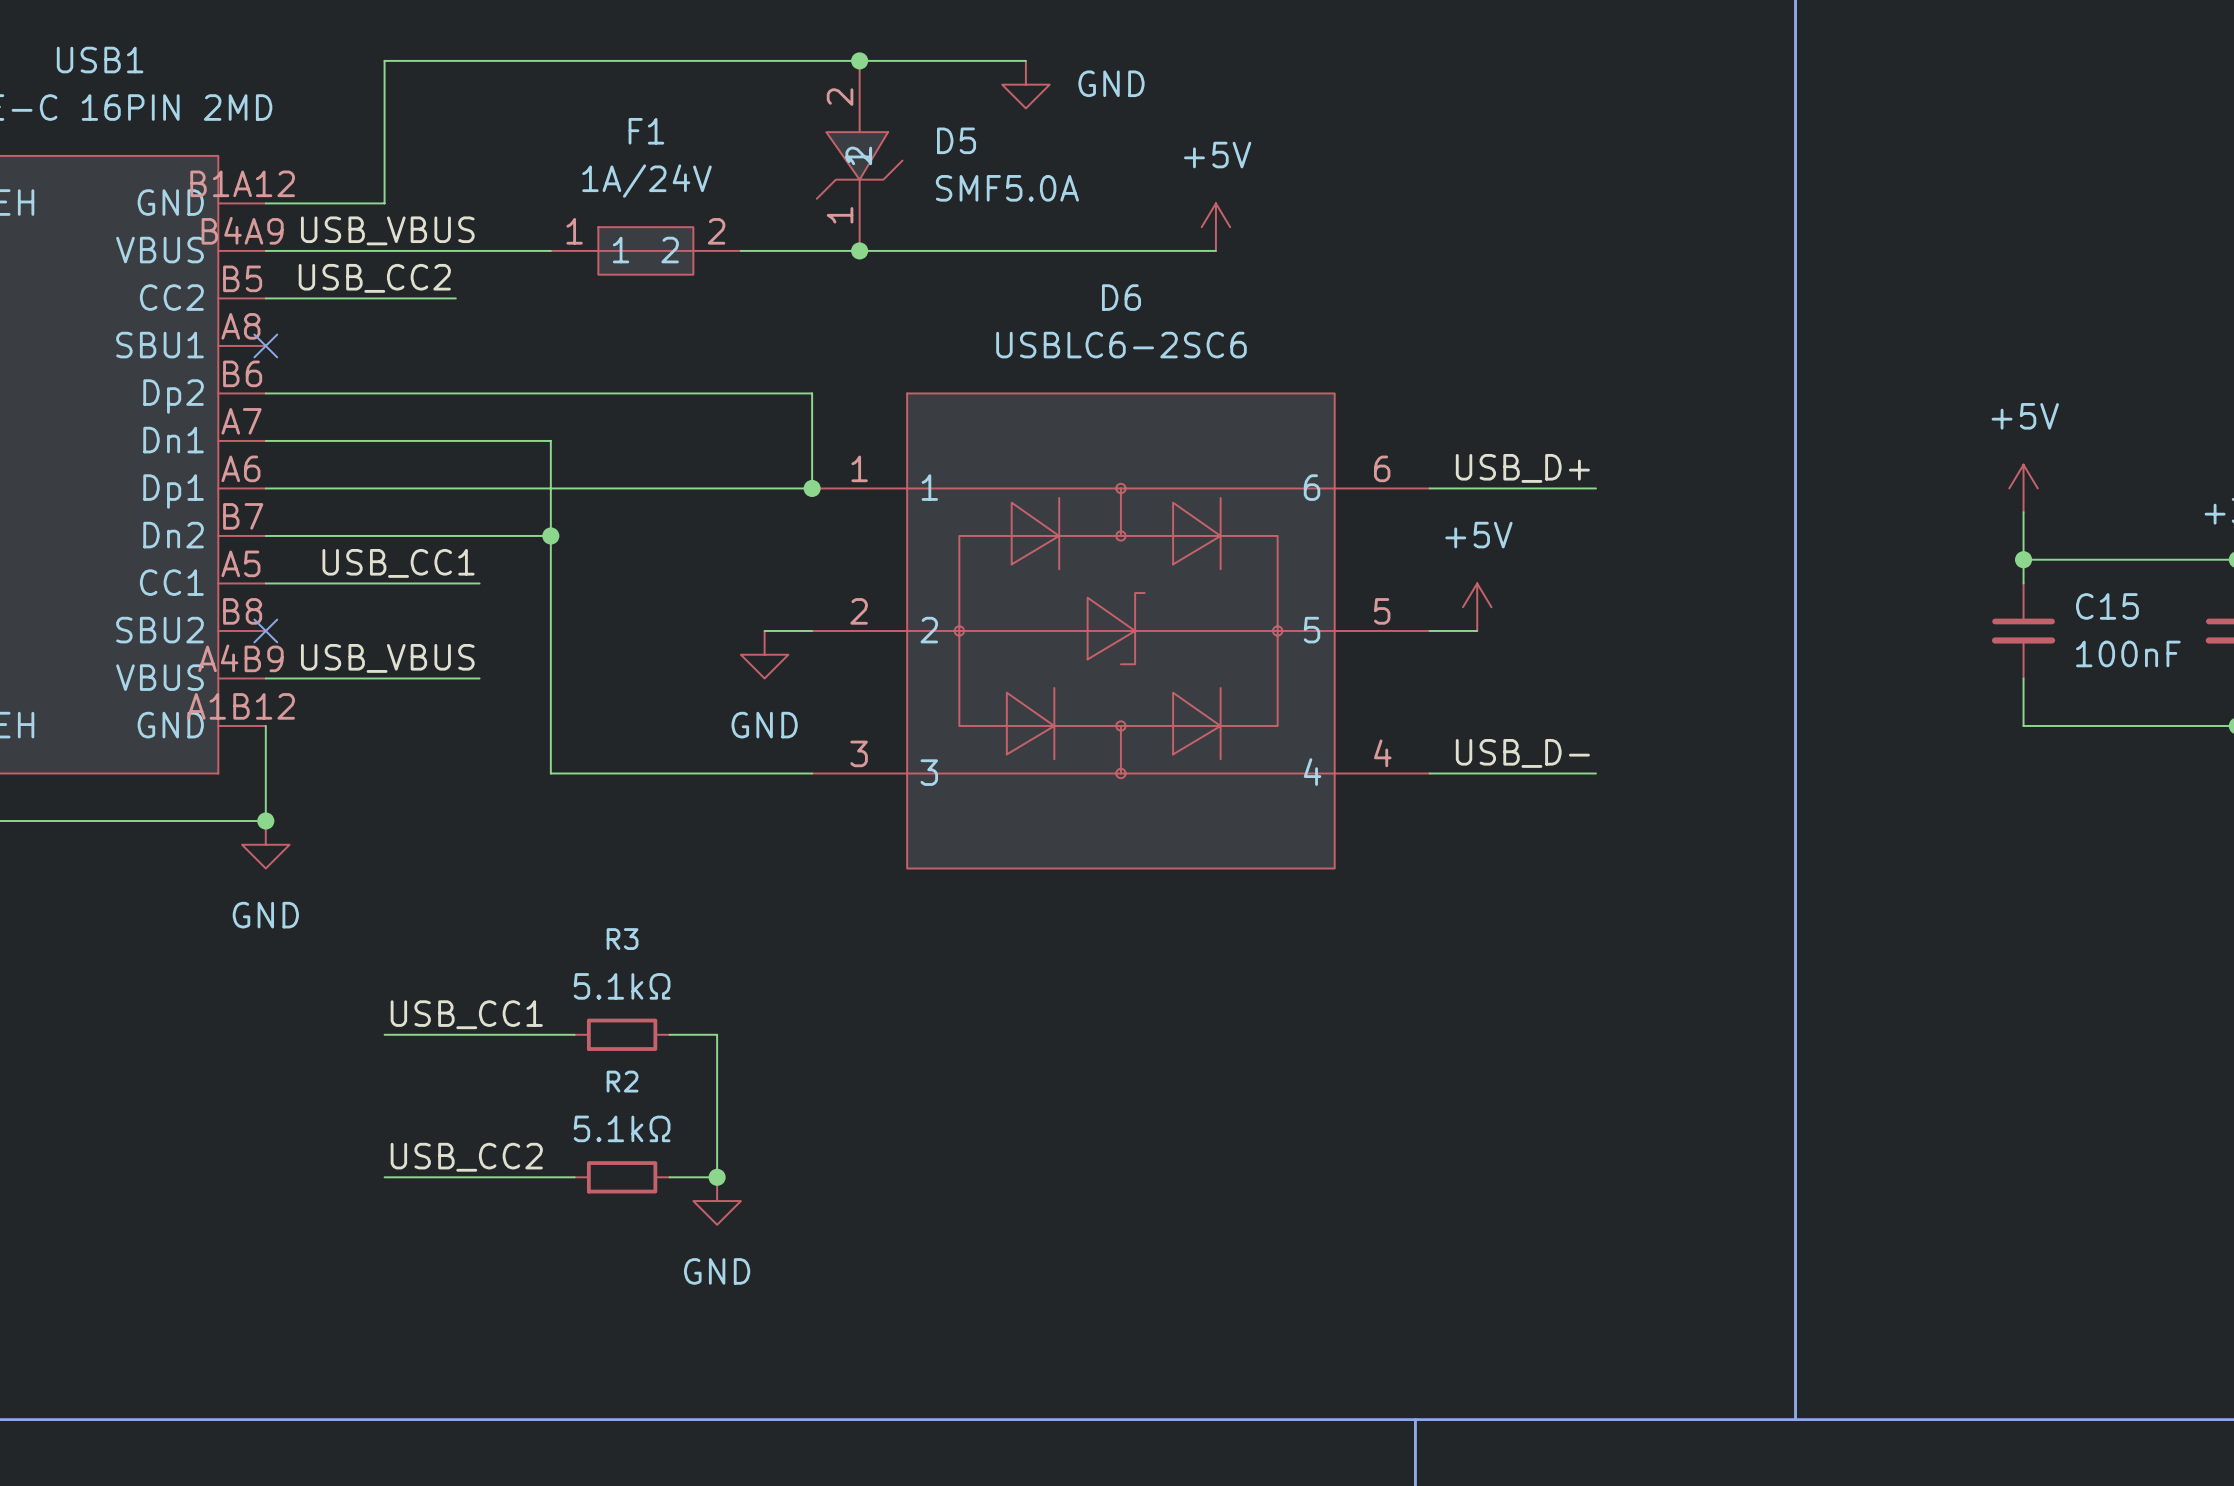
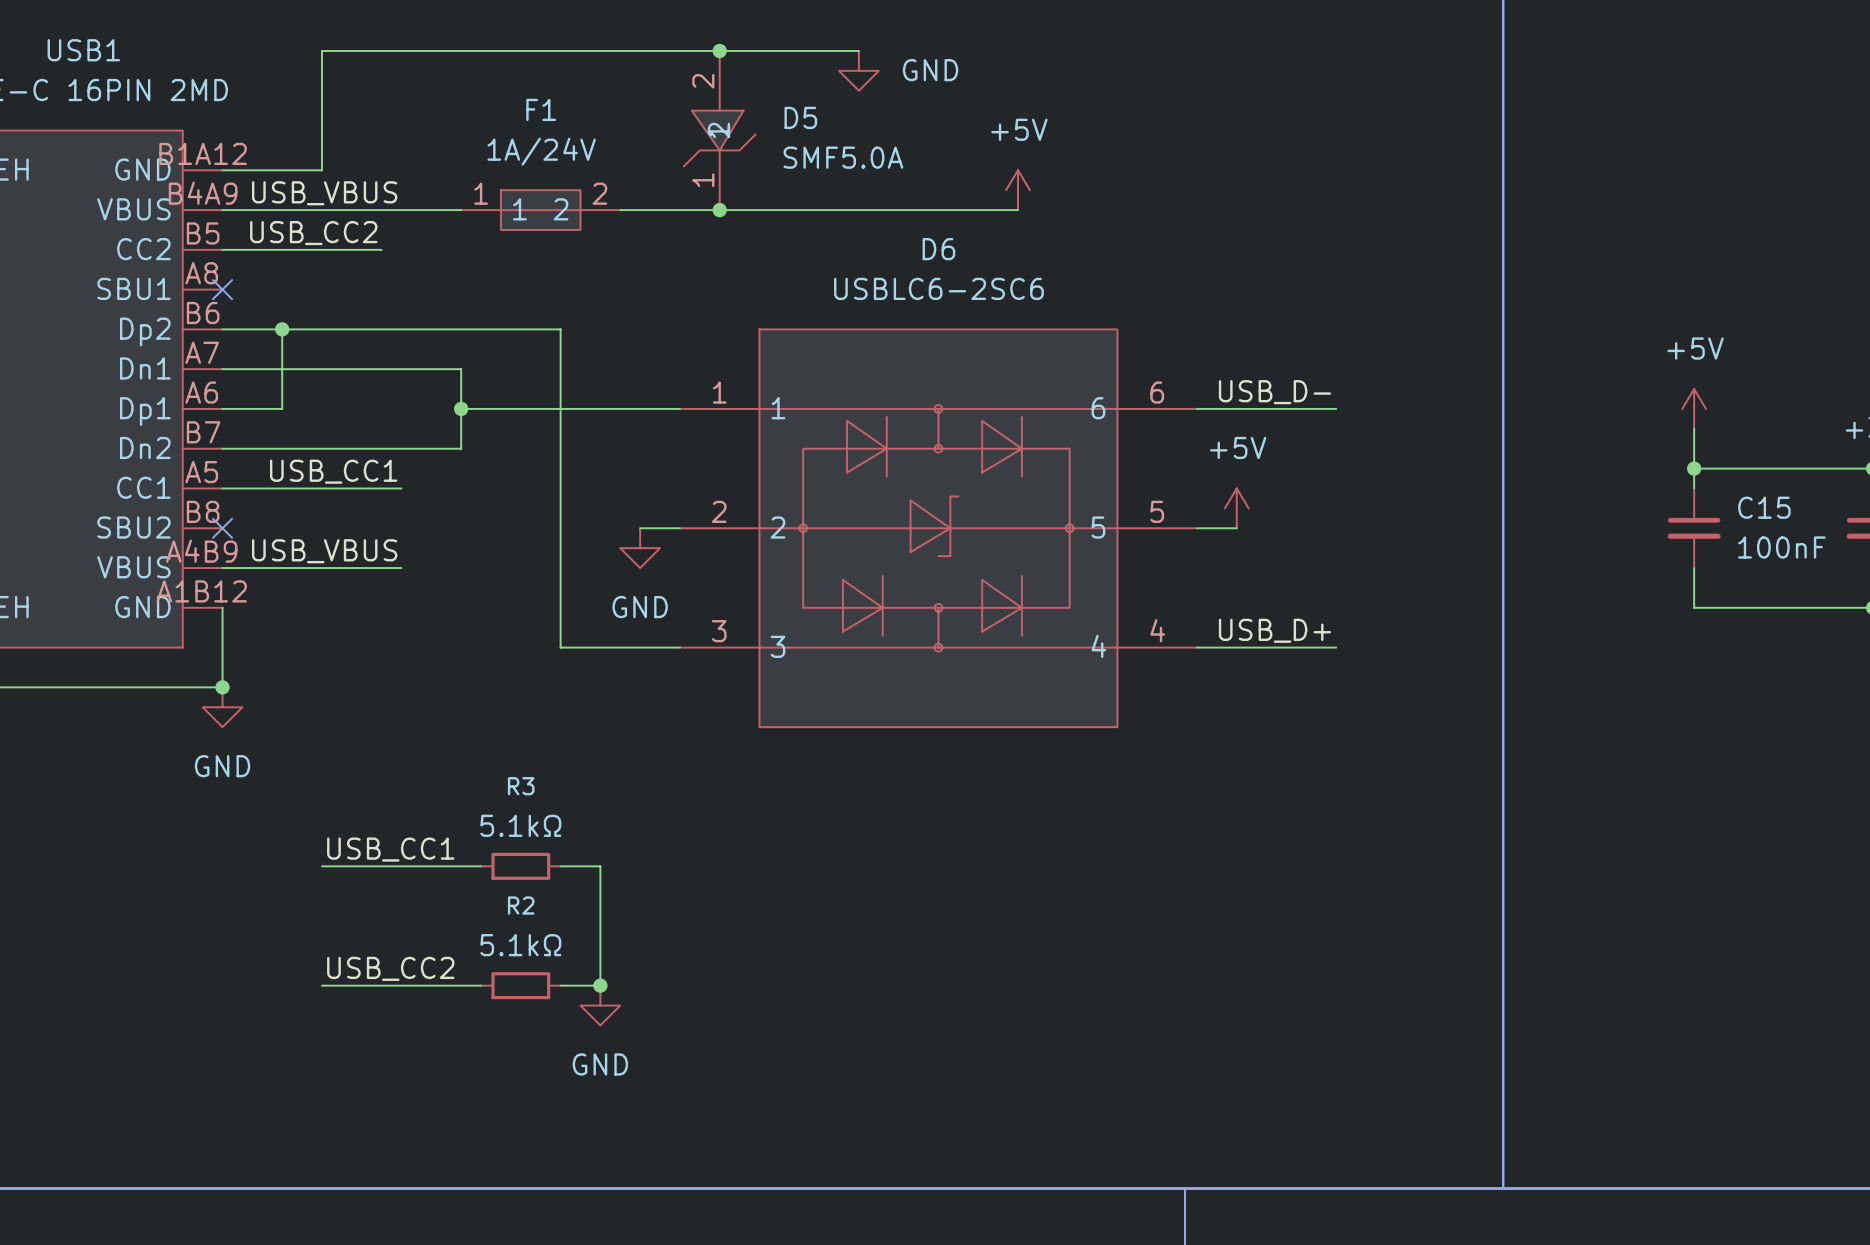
junction: none -> (282, 329)
wire: (669, 393) (812, 393) (812, 488) -> none
label: USB_D+ (1522, 468) -> USB_D- (1274, 392)
wire: (337, 488) (550, 488) -> (282, 408) (282, 329)
junction: (812, 488) -> none
wire: (550, 535) (550, 773) (669, 773) -> (560, 329) (560, 647)
junction position: (550, 535) -> (461, 408)
label: USB_D- (1522, 753) -> USB_D+ (1274, 630)

